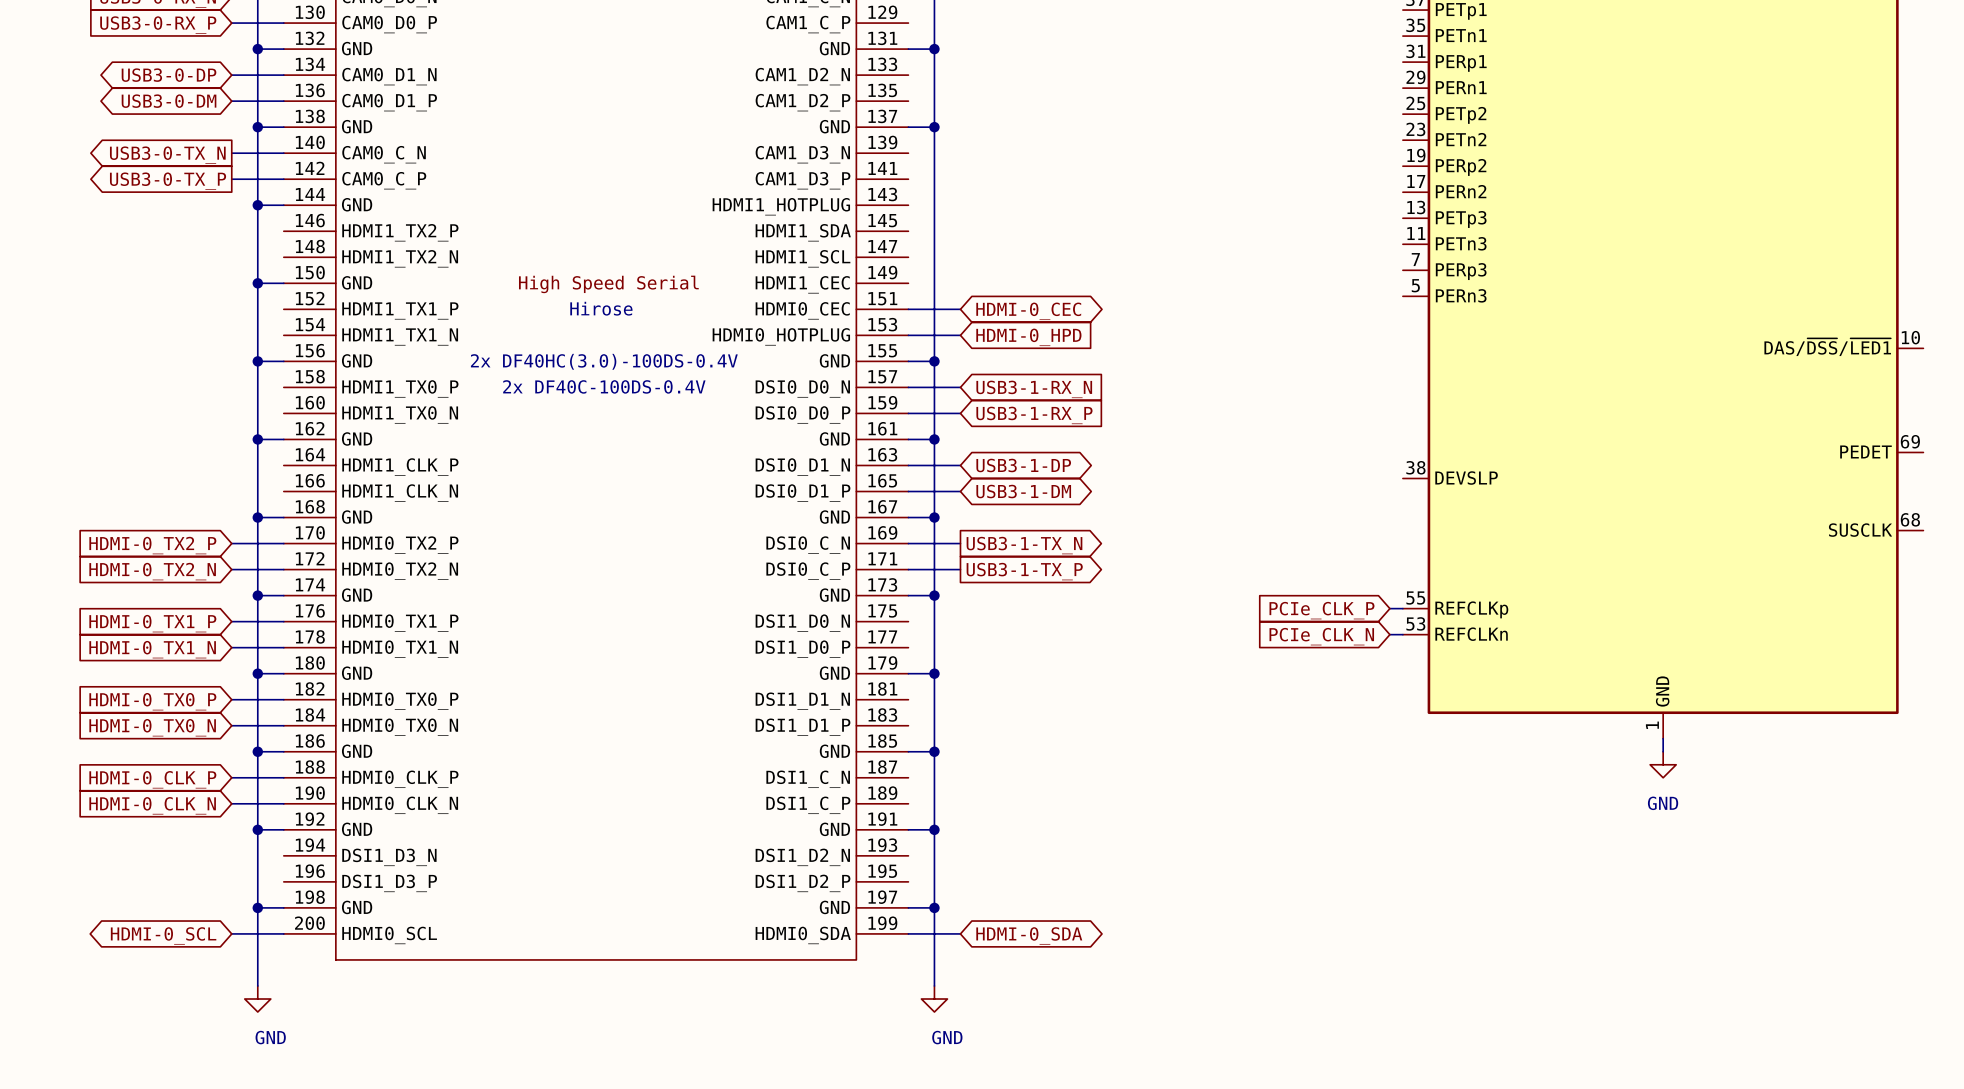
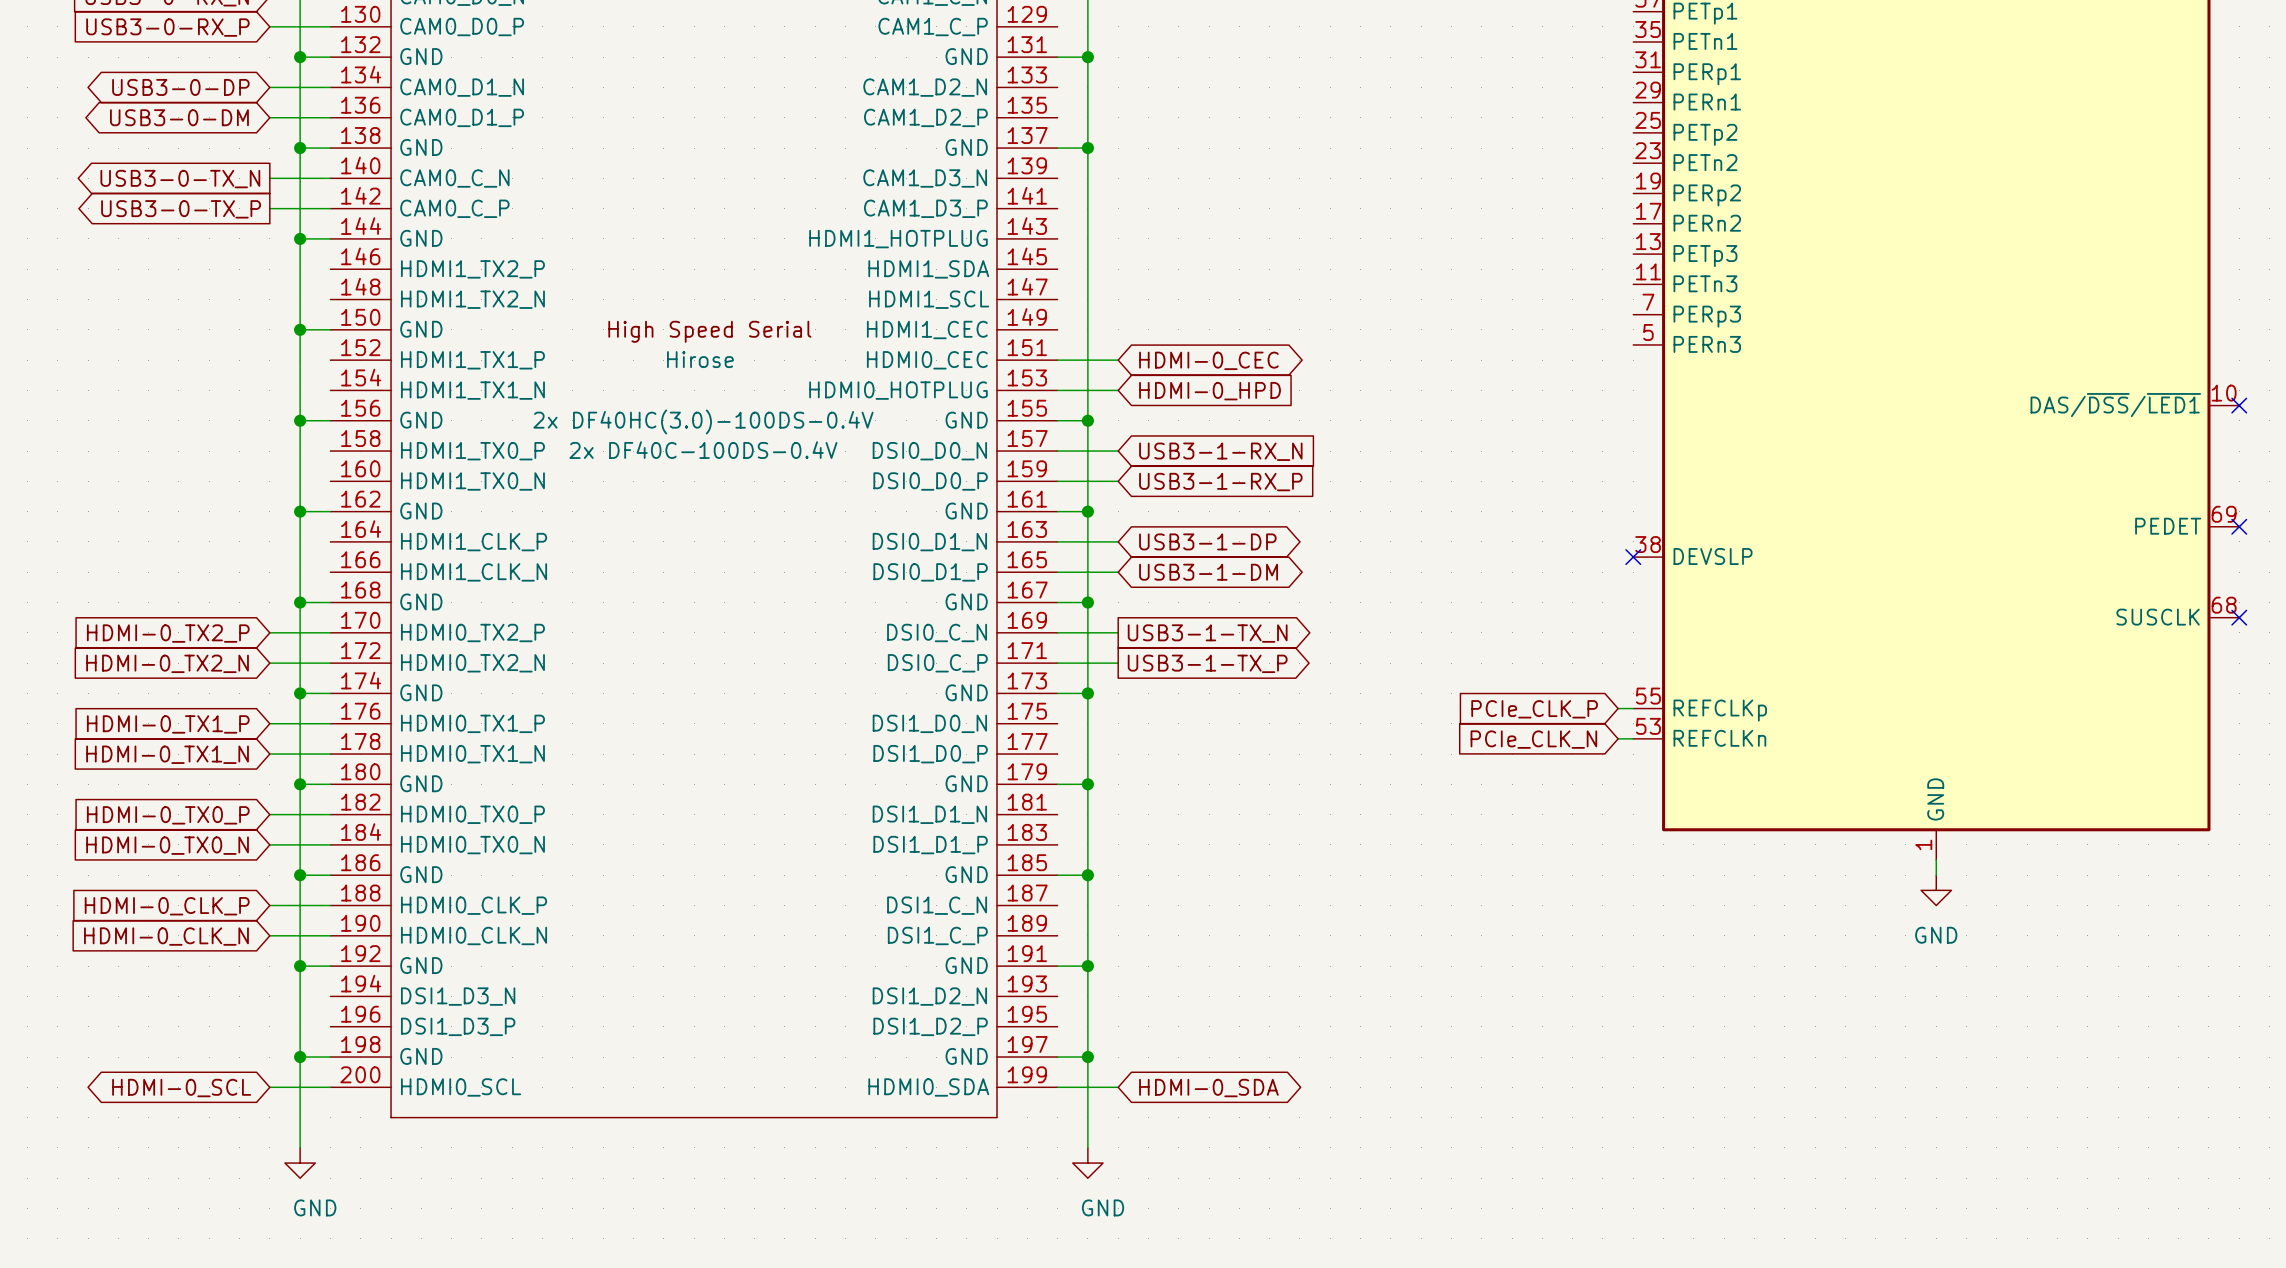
no-connect mark: none -> (2239, 405)
no-connect mark: none -> (2239, 526)
no-connect mark: none -> (1633, 557)
no-connect mark: none -> (2239, 617)

